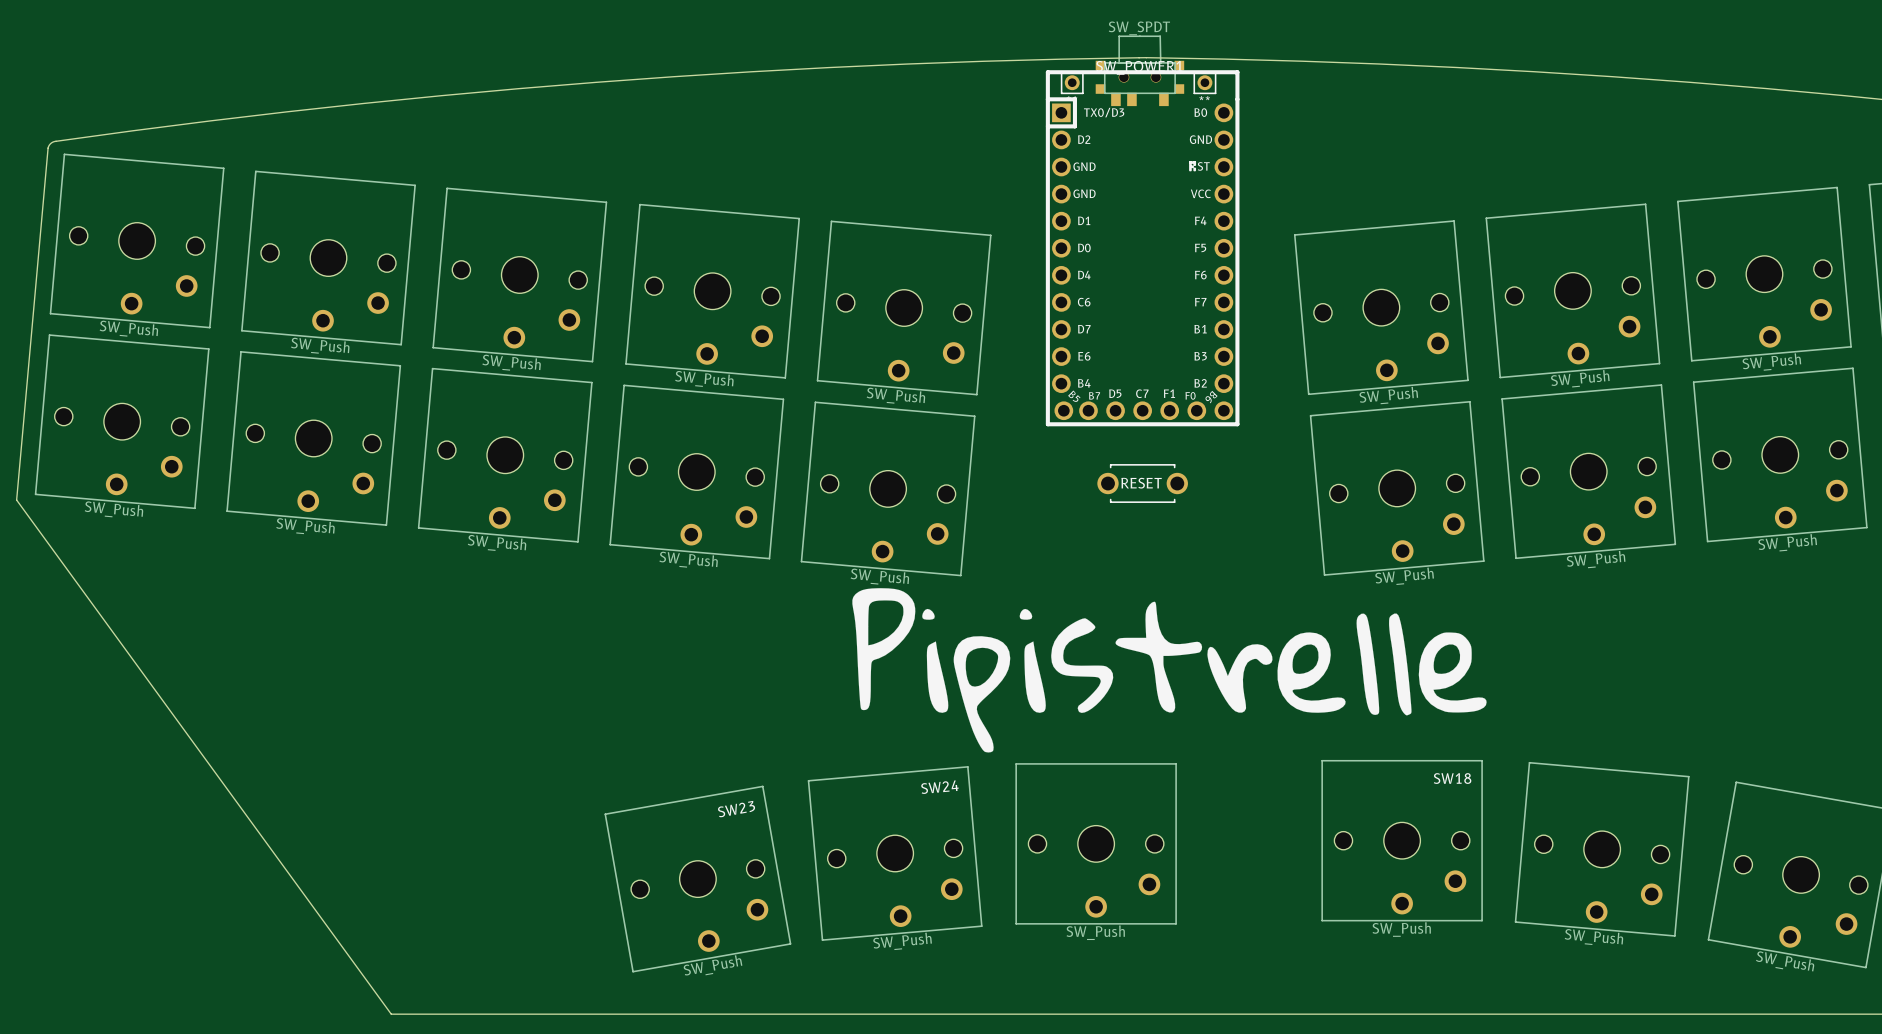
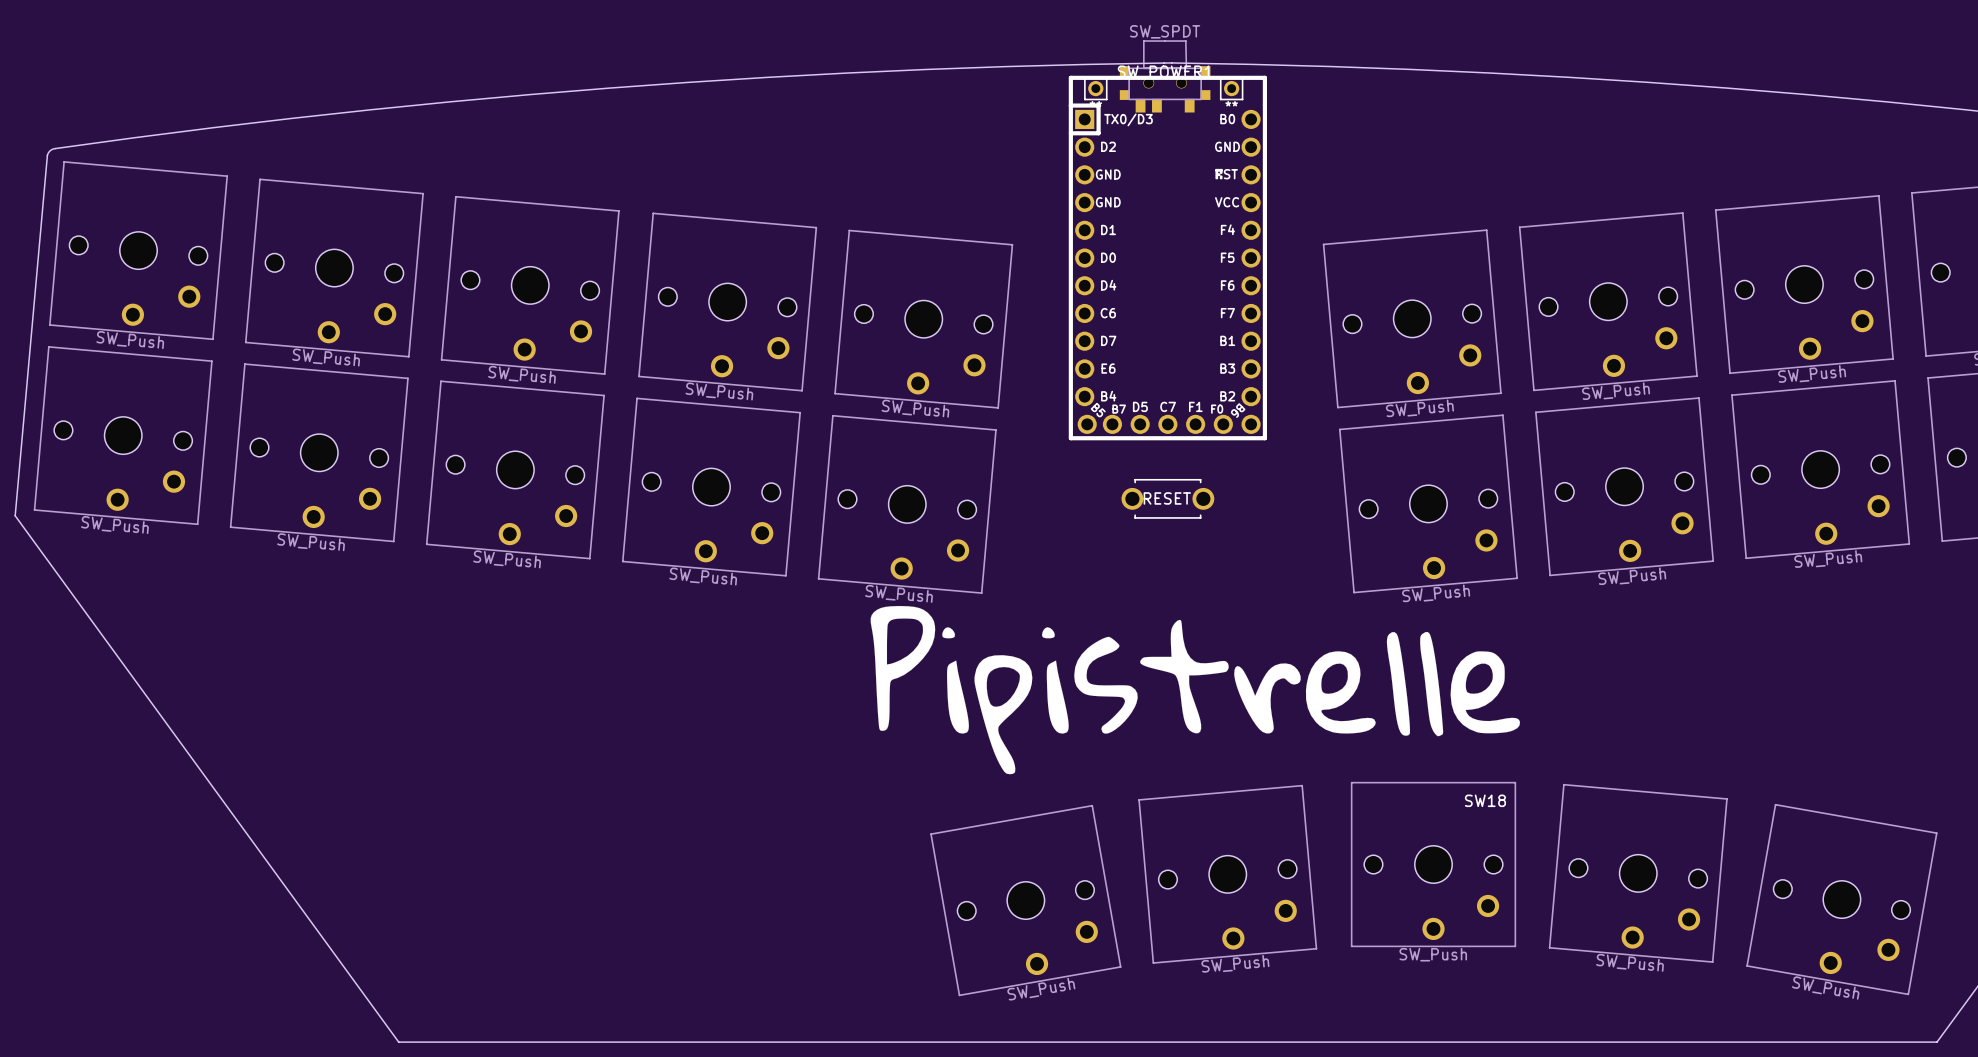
part: SW_Push (1096, 843) -> none
part: none -> SW_Push (1227, 874)
SW24: SW_Push (895, 853) -> none
part: none -> SW_Push (1025, 900)
SW23: SW_Push (697, 879) -> none

